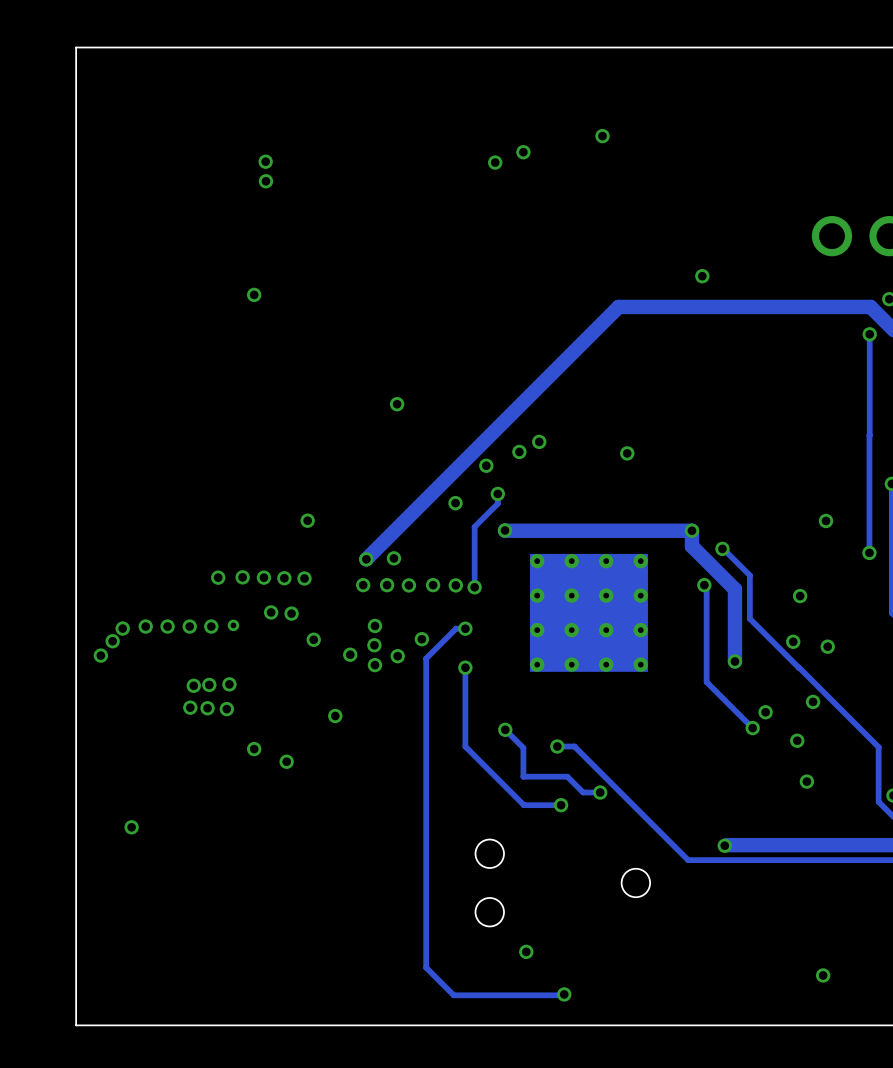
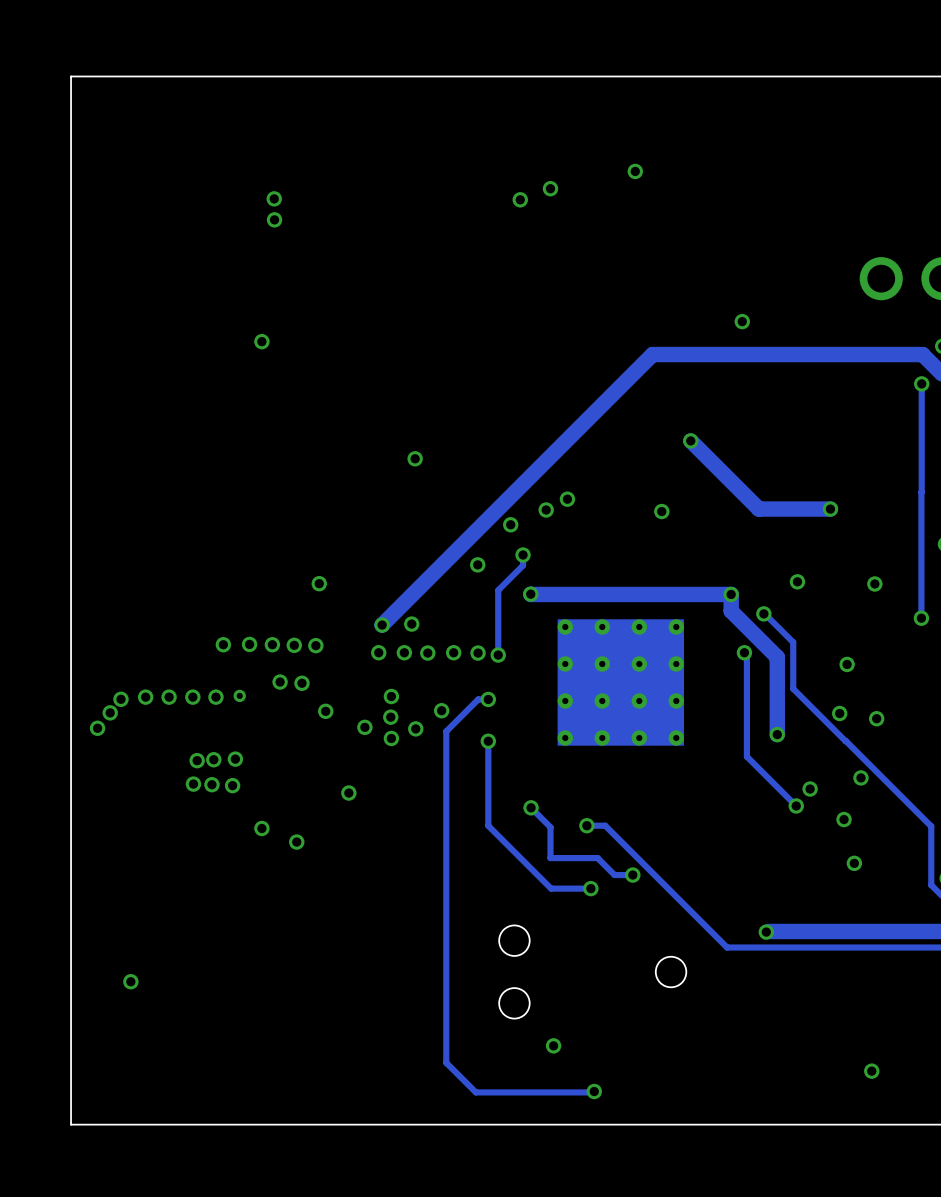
track: none -> (690, 440) (758, 509) (830, 509)
via: none -> (690, 440)
via: none -> (830, 509)
via: none -> (797, 581)
via position: (131, 827) -> (130, 981)

